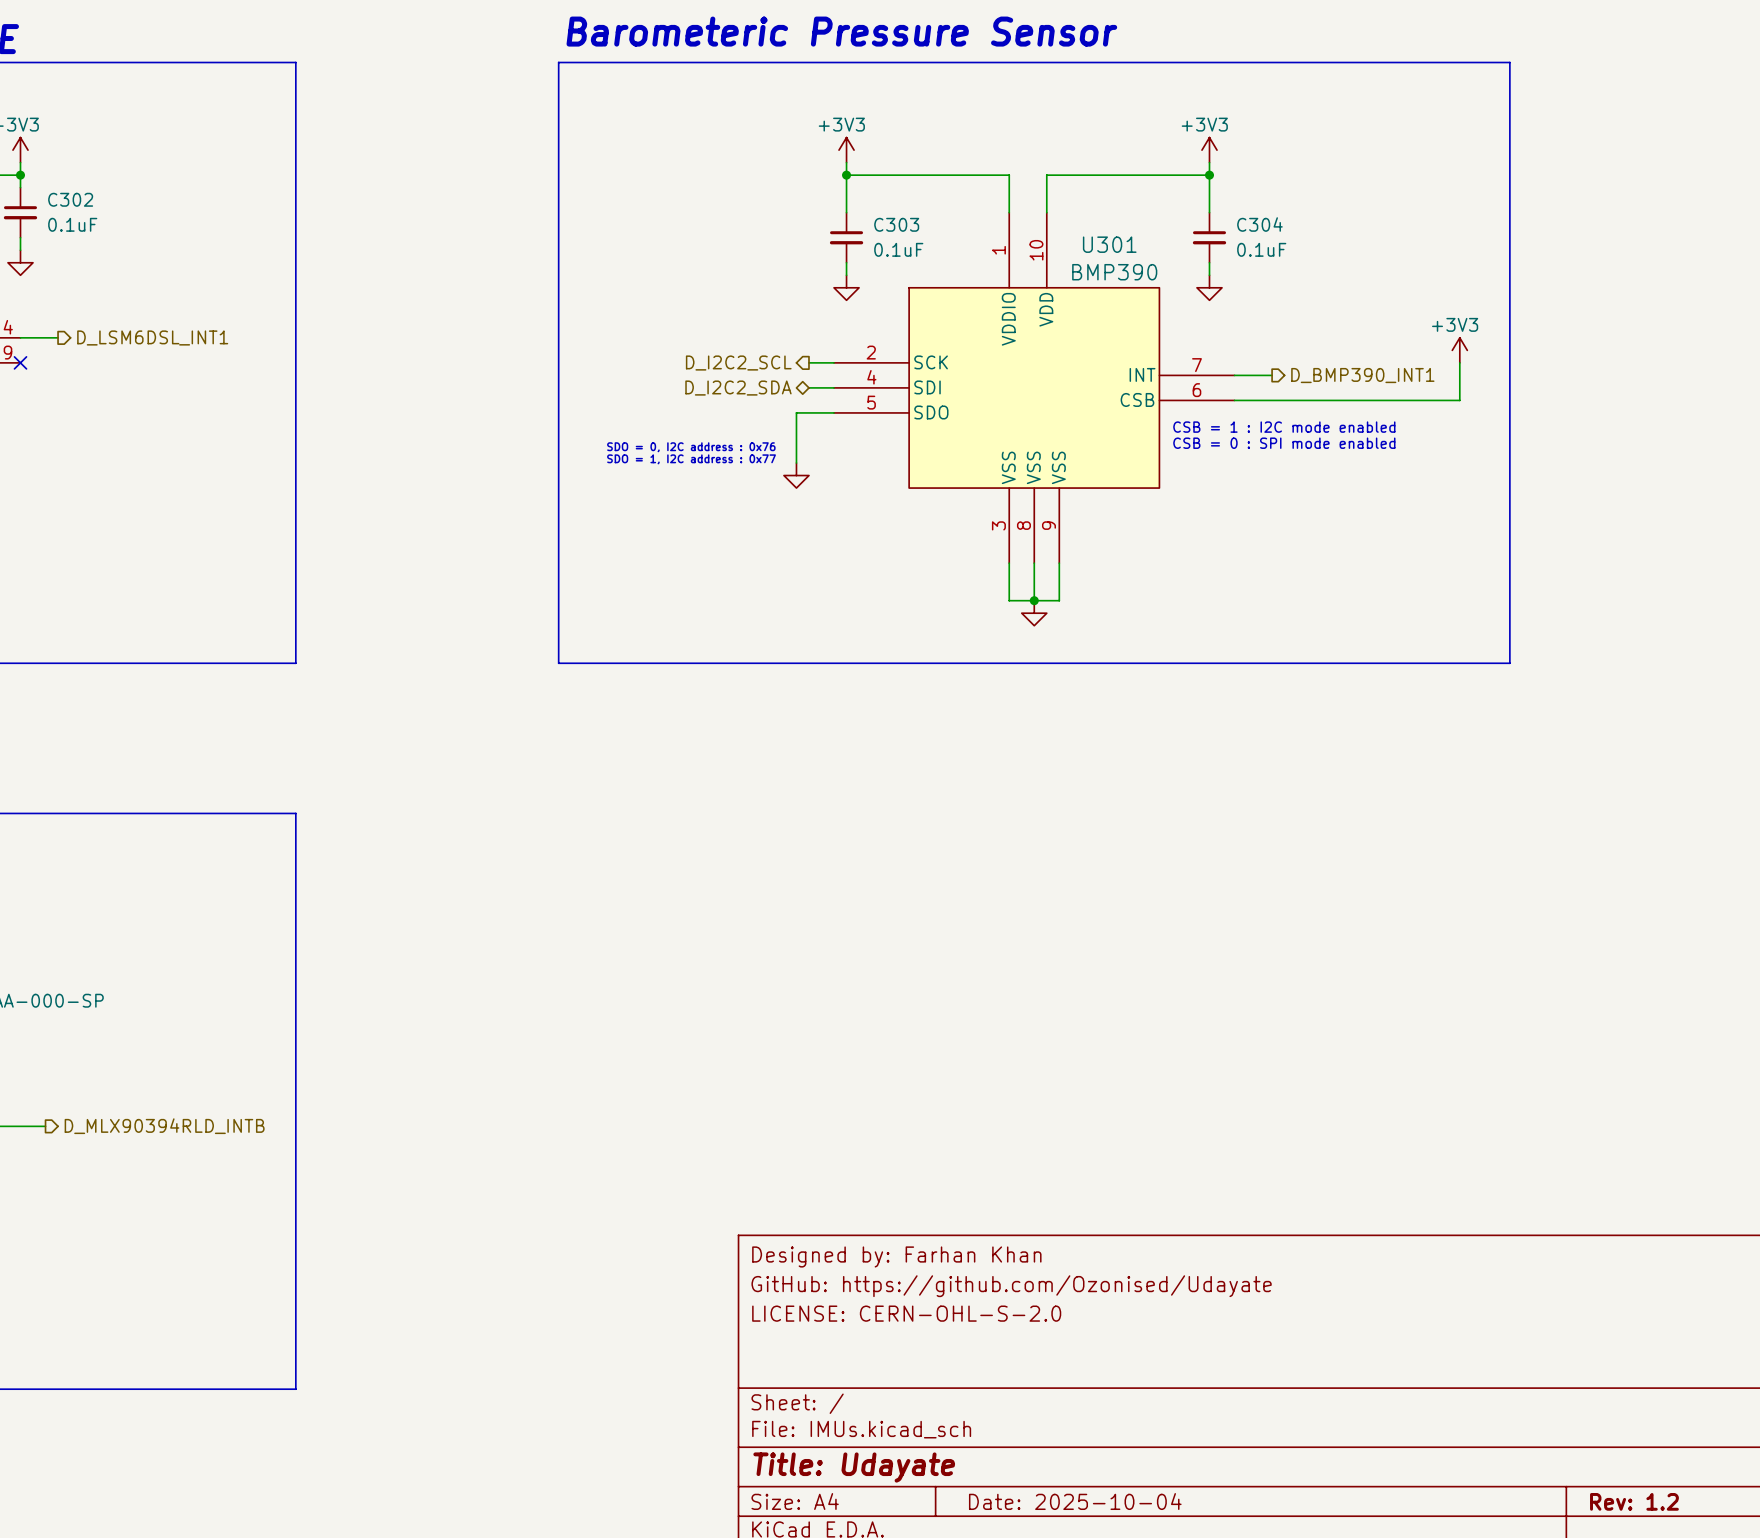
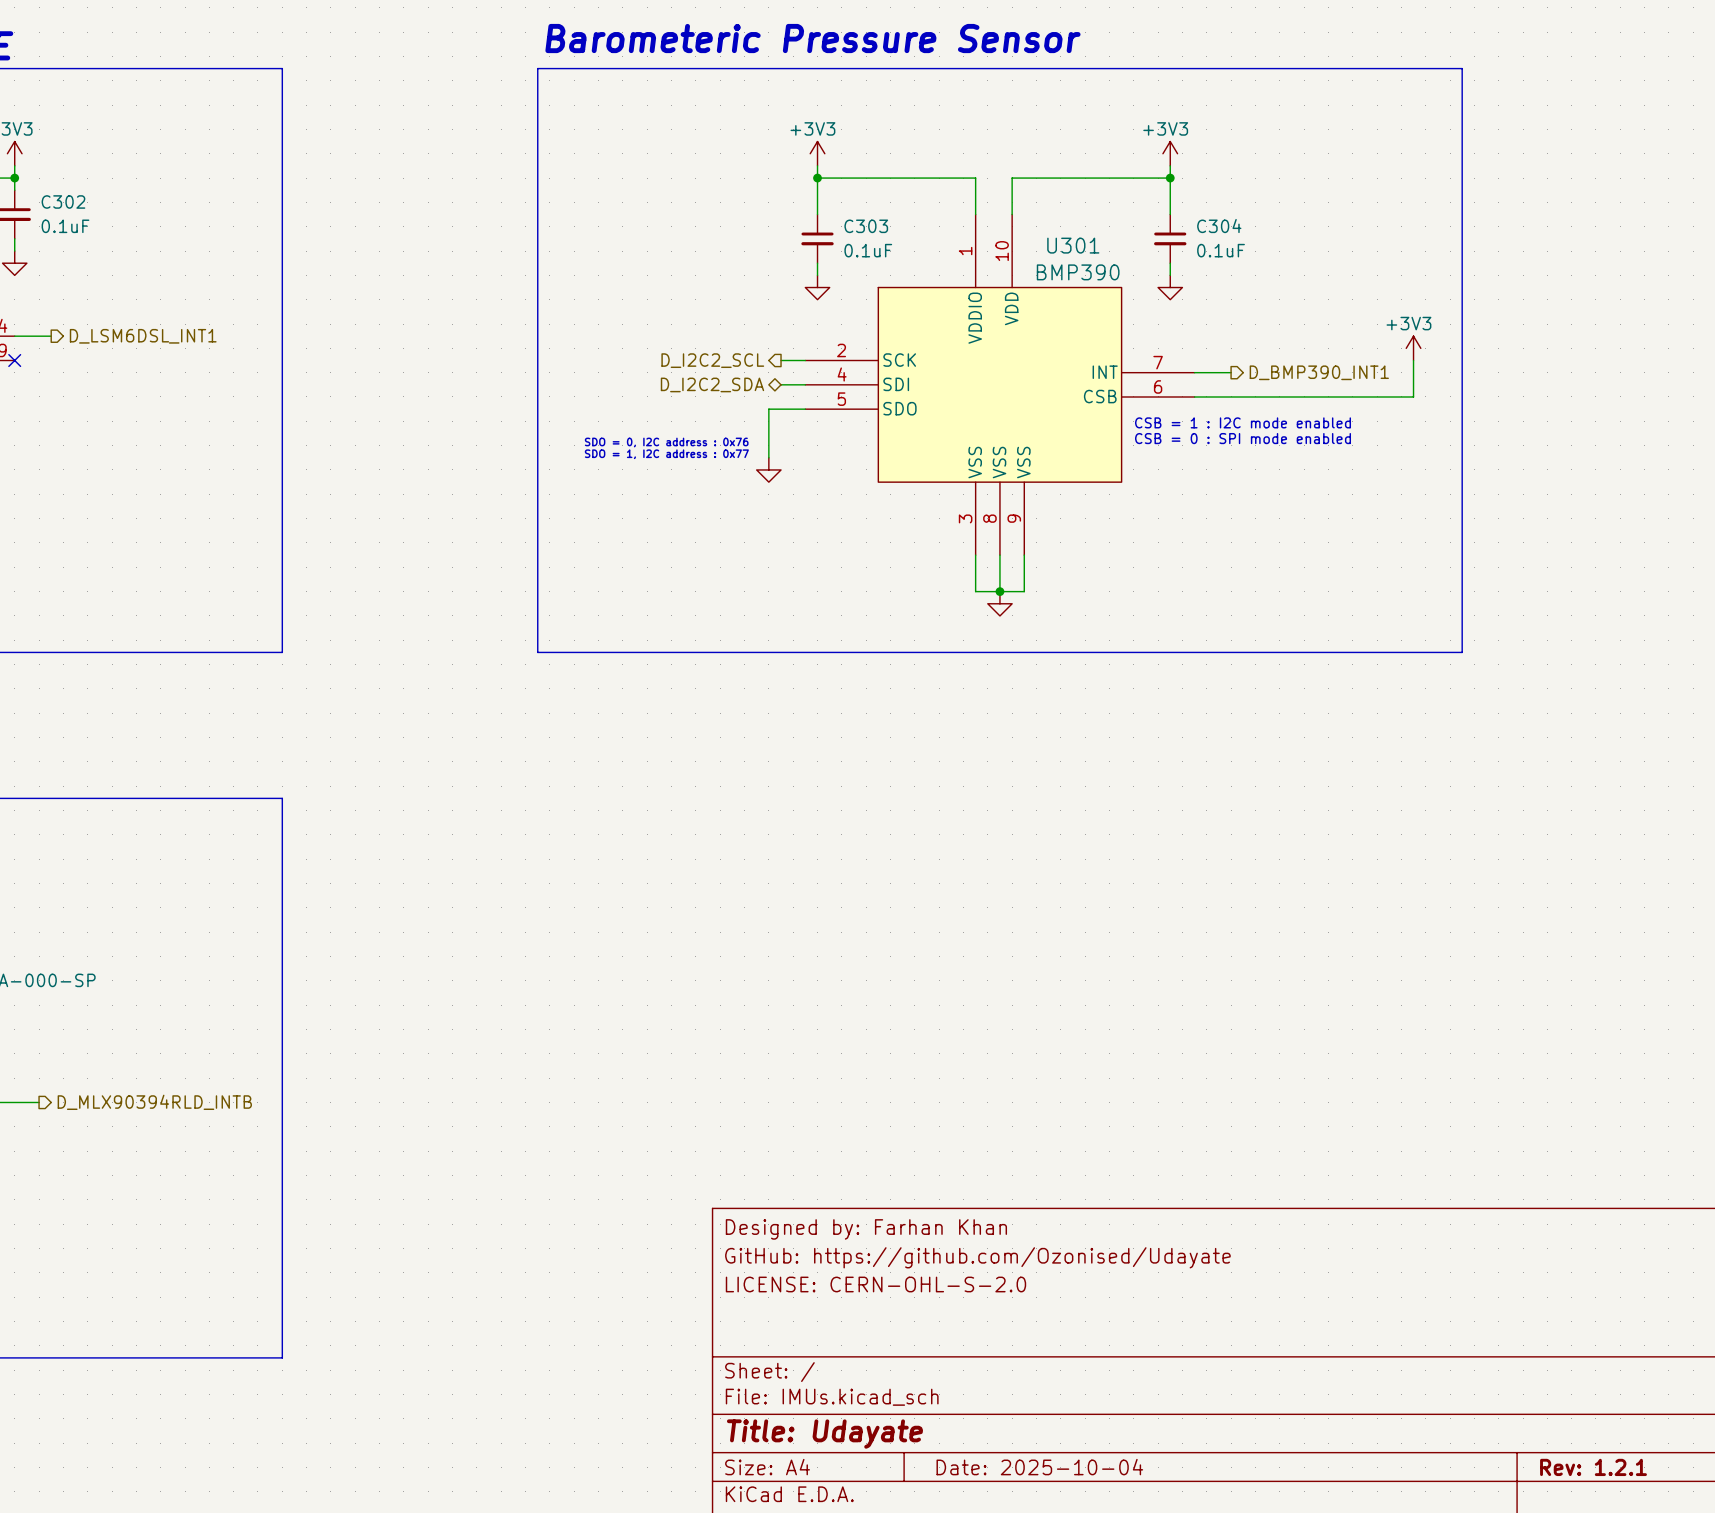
title block: Rev: 1.2 (1634, 1501) -> Rev: 1.2.1 (1593, 1467)

